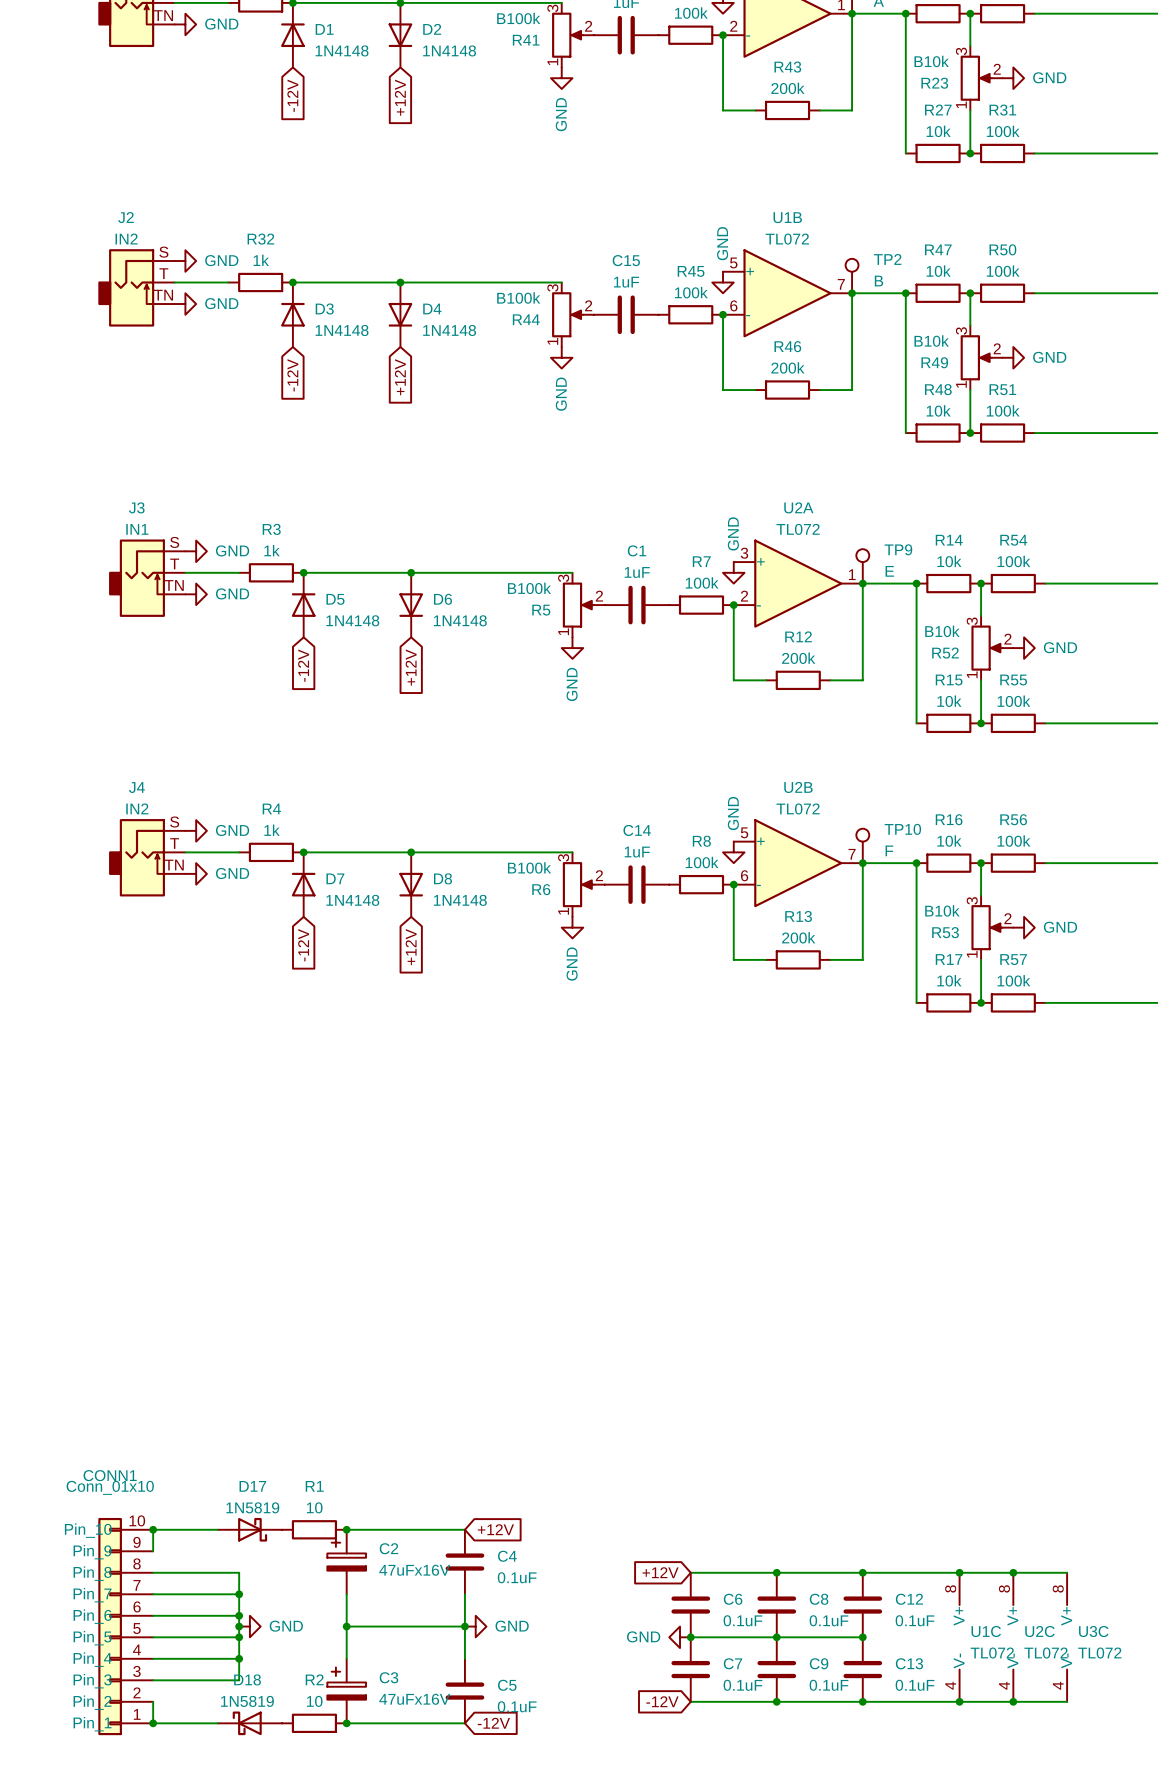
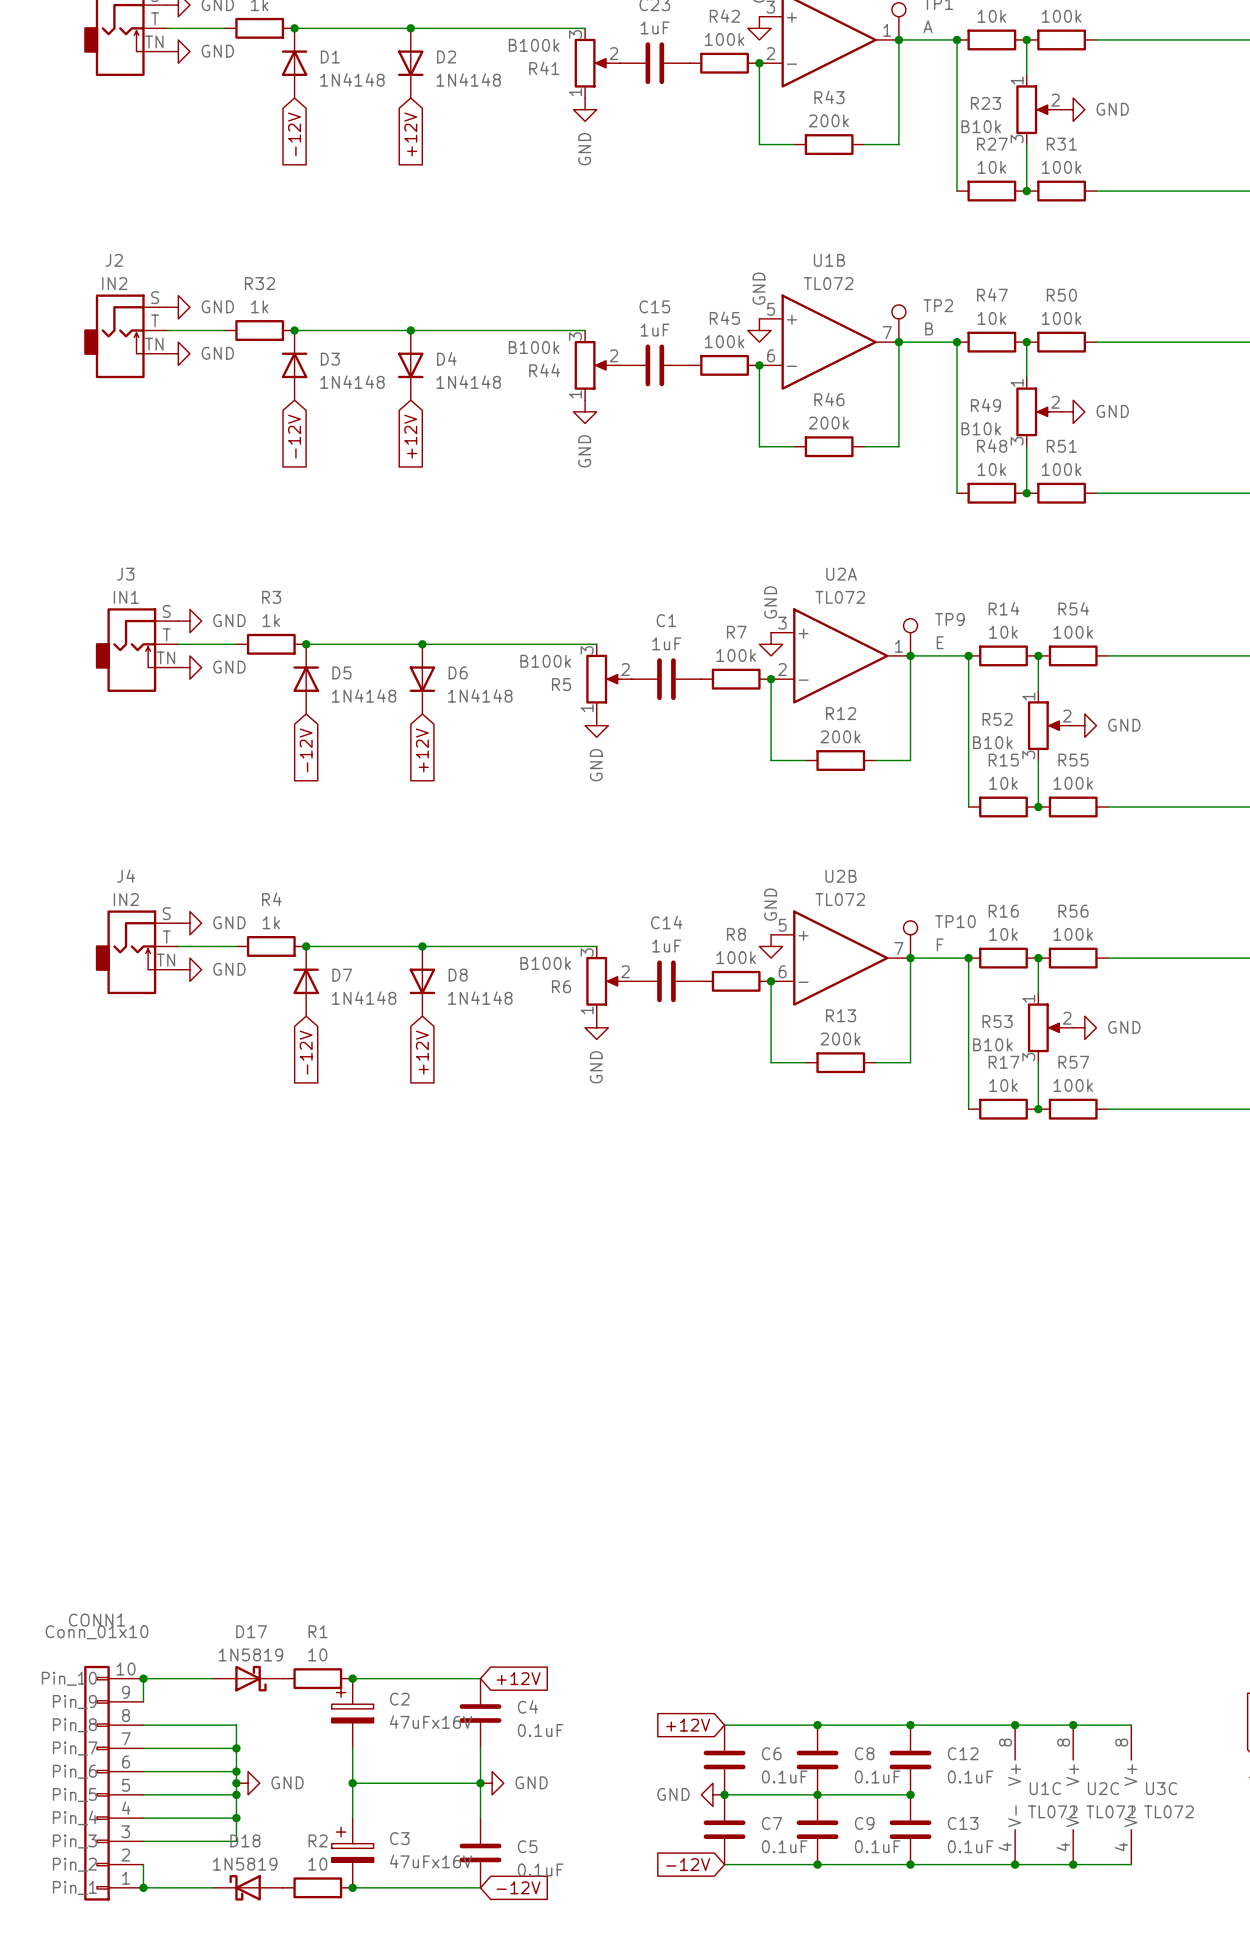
R23 flip: as is (976, 78) -> up-down (1033, 109)
R49 flip: as is (976, 357) -> up-down (1033, 411)
R52 flip: as is (986, 648) -> up-down (1044, 725)
R53 flip: as is (986, 927) -> up-down (1044, 1027)

